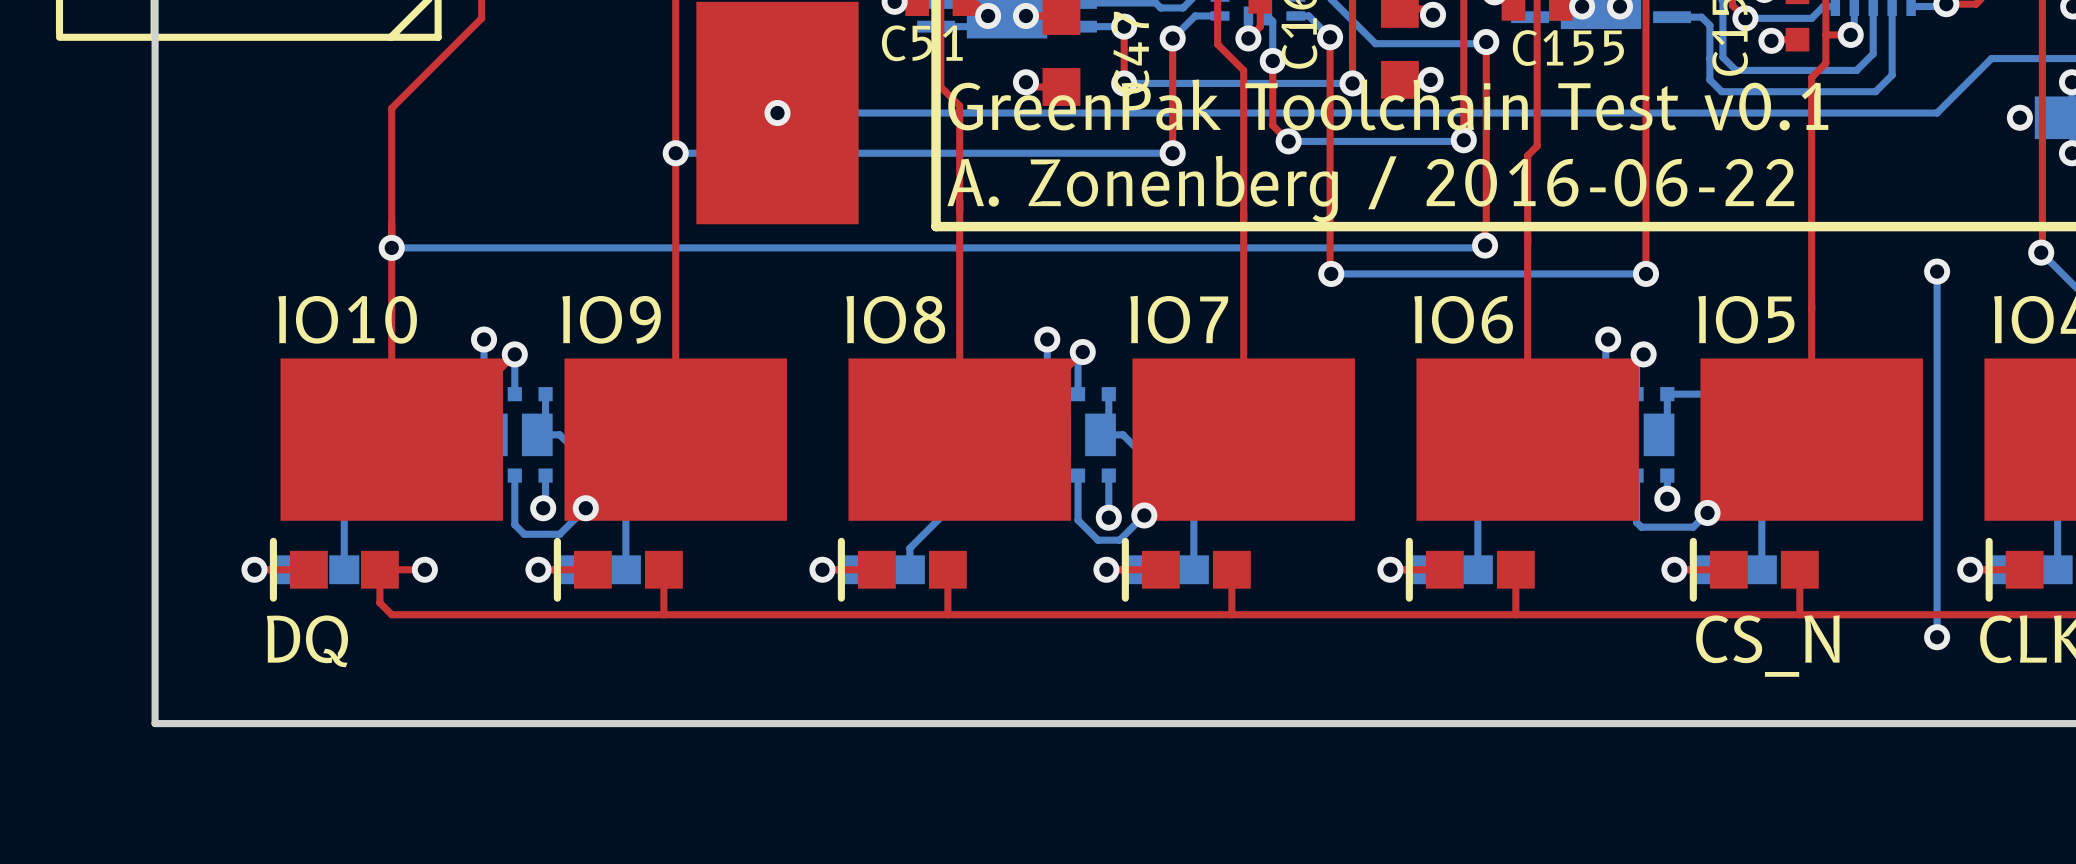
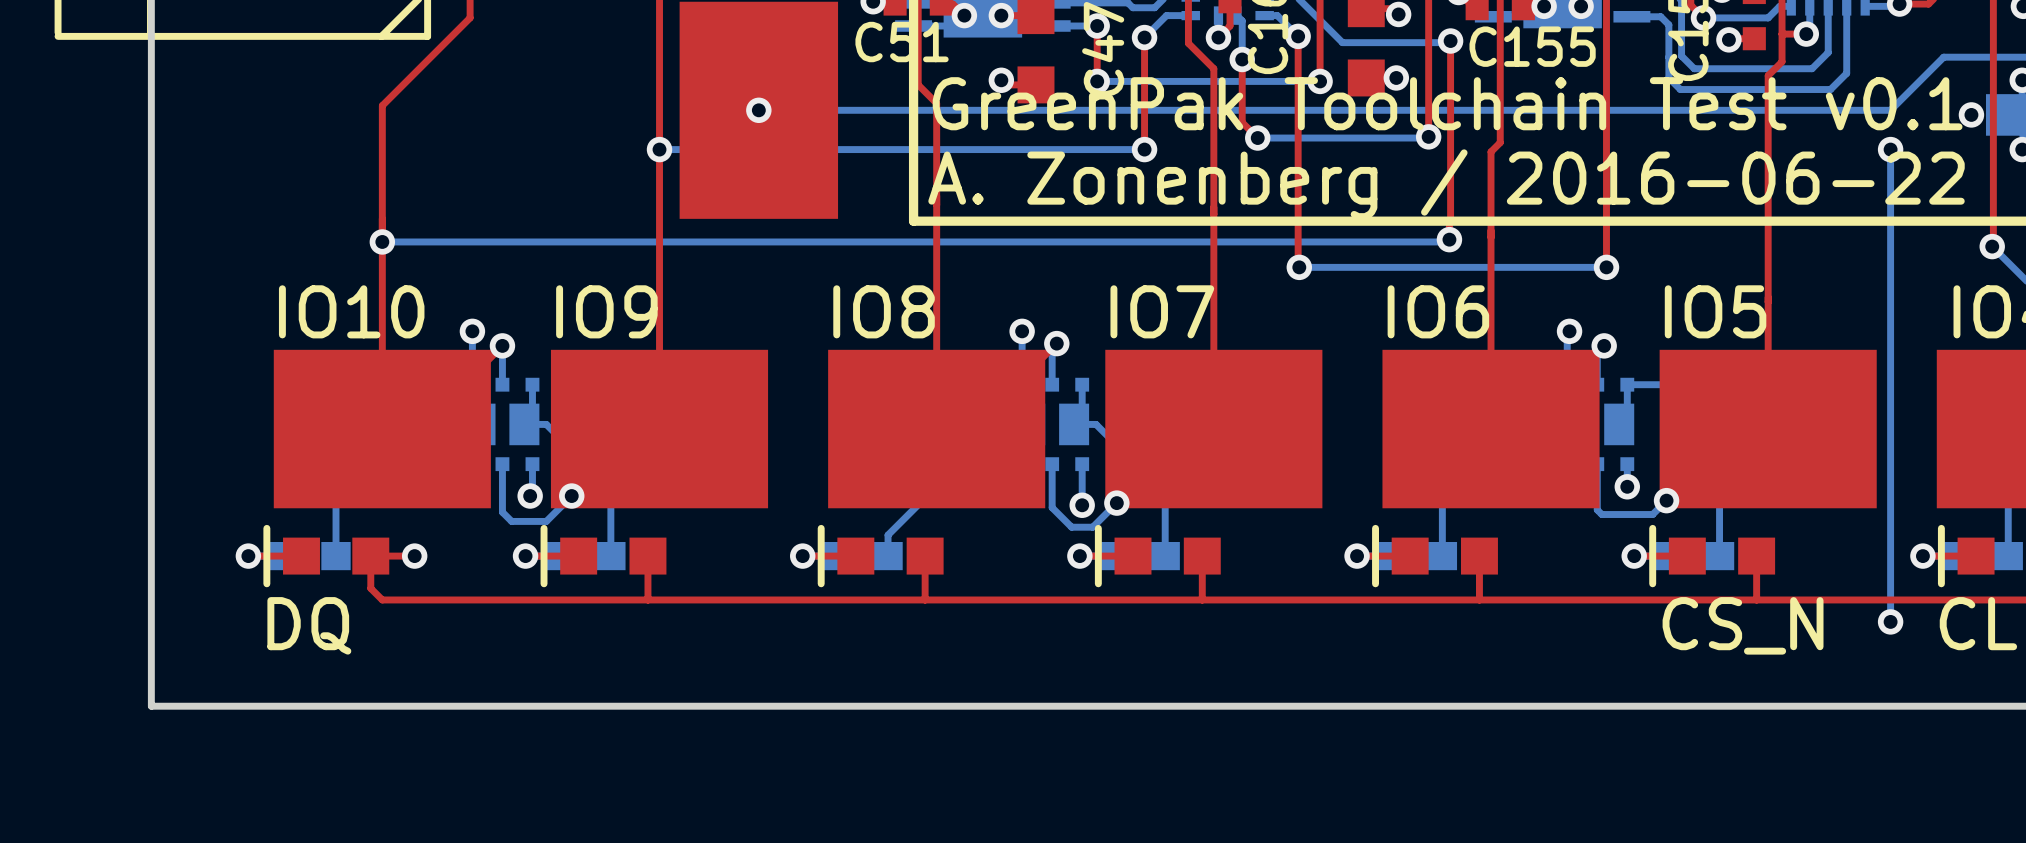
bottom track: none -> (1890, 149) (1890, 265)
via position: (1937, 271) -> (1890, 149)

